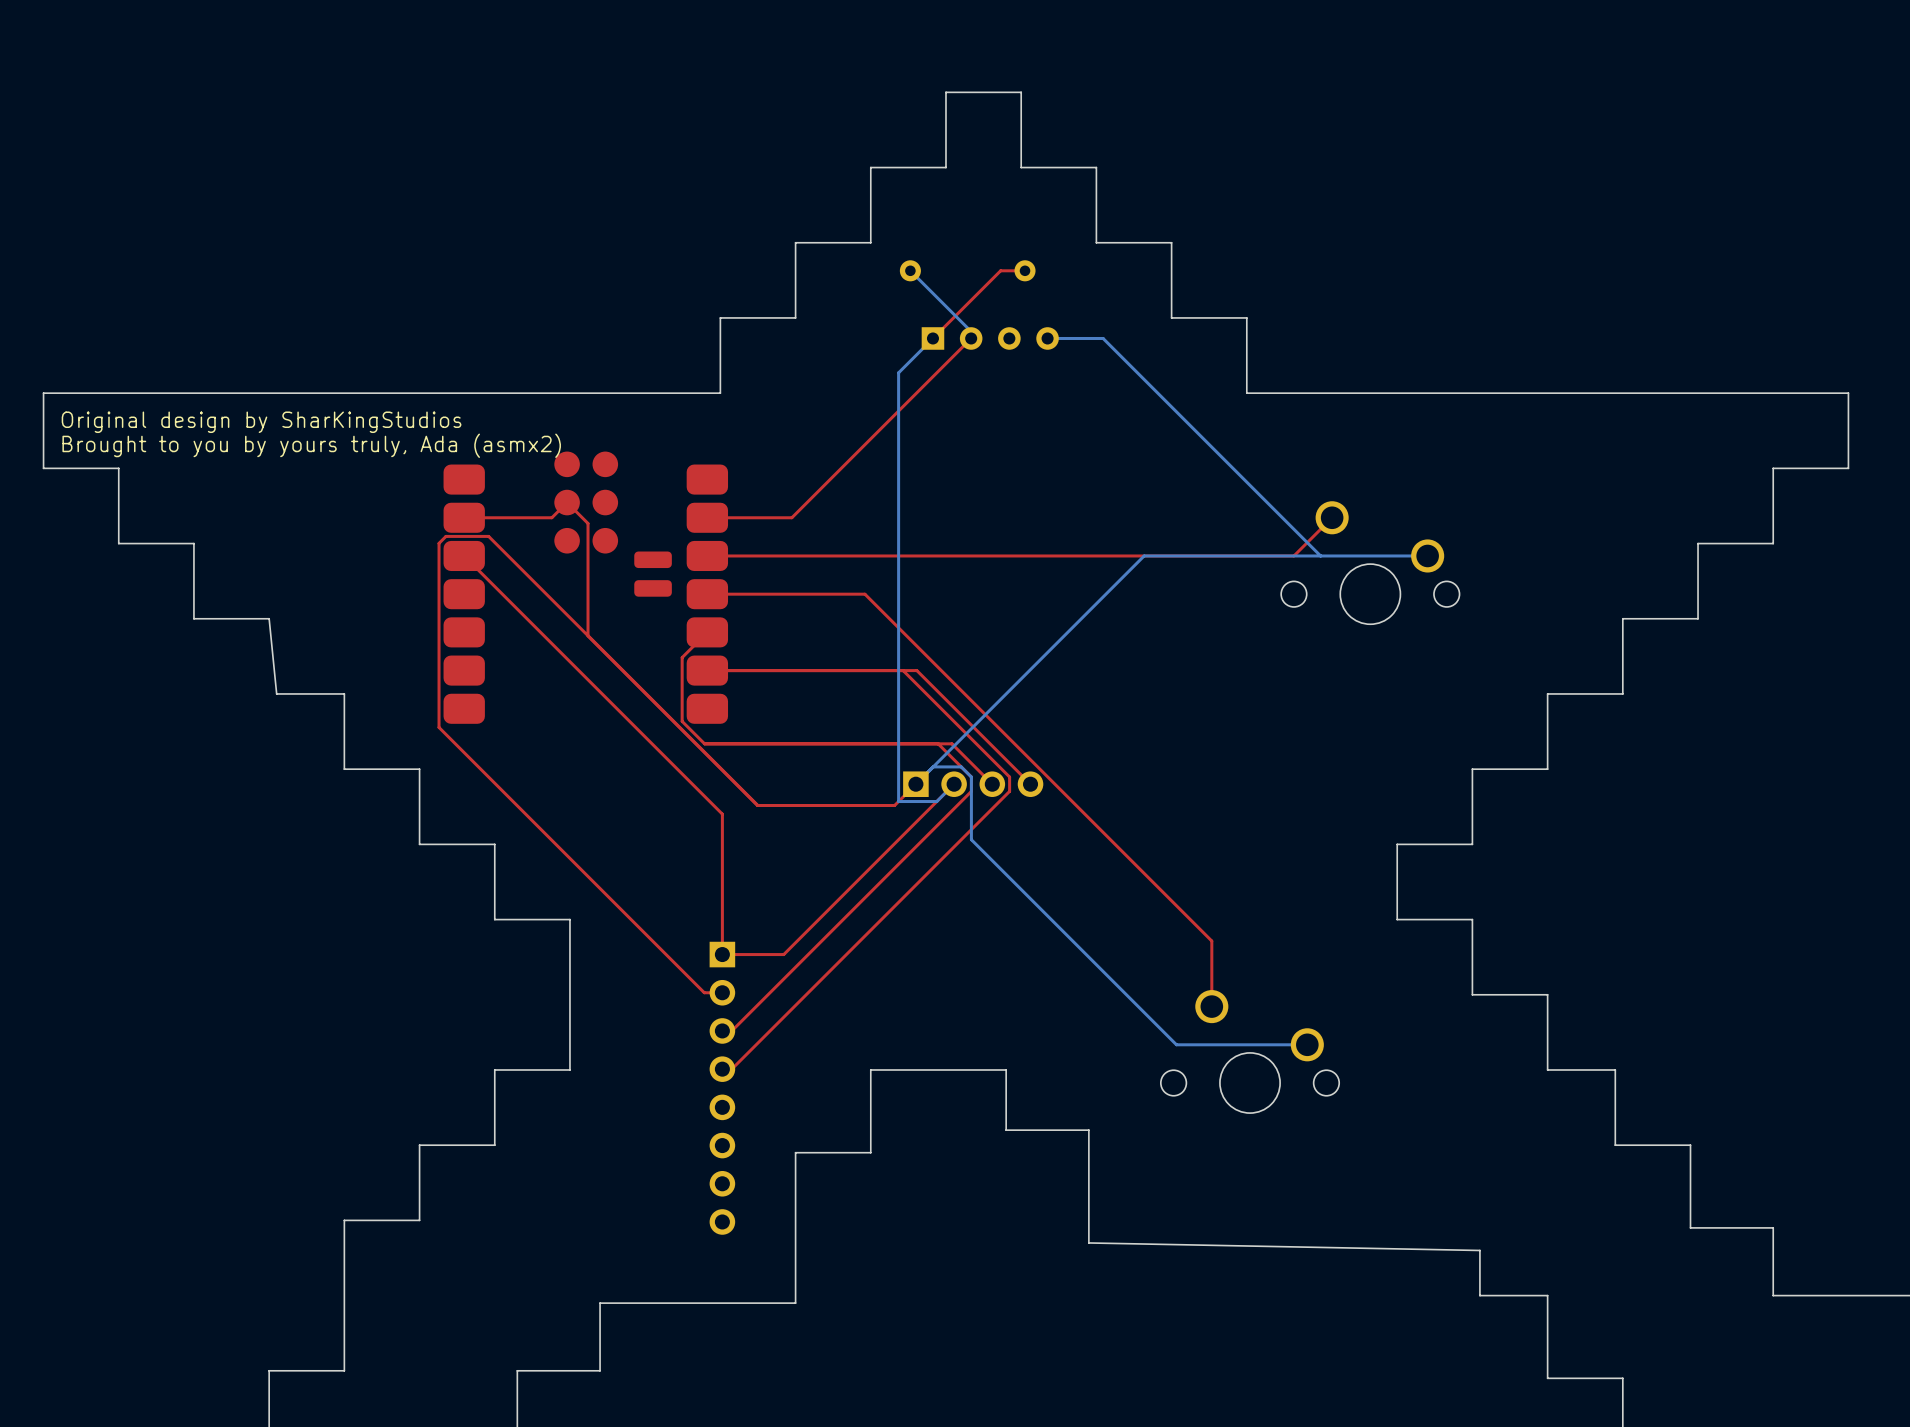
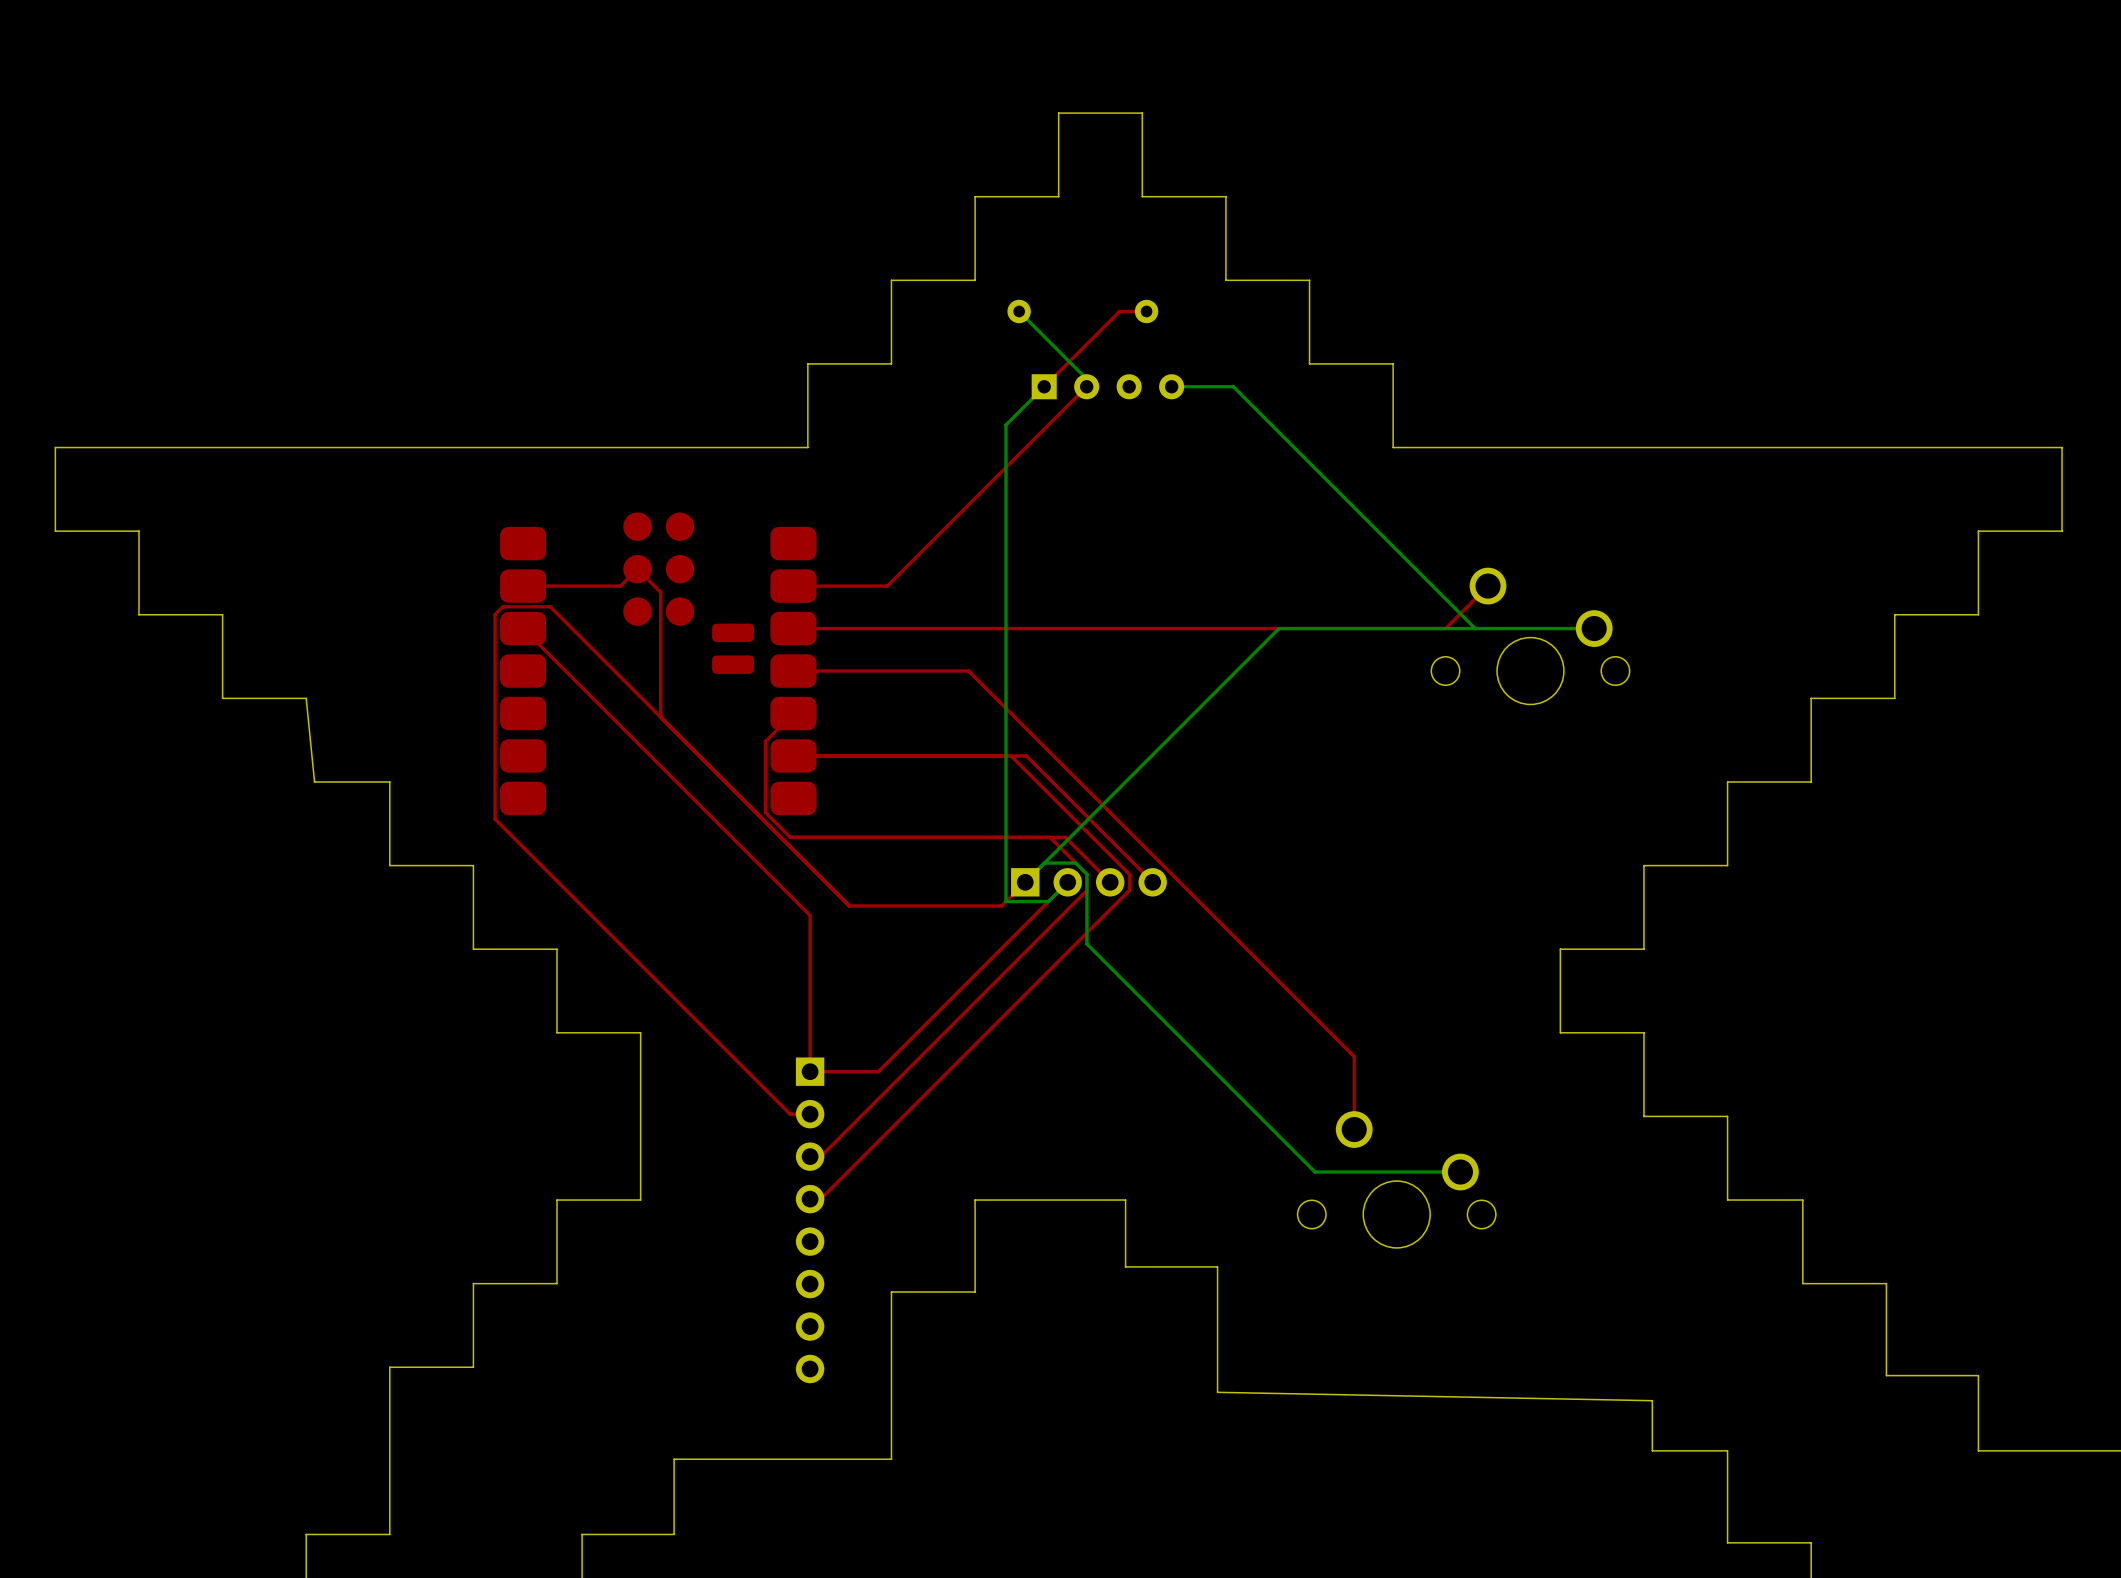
text: Original design by SharKingStudios (261, 422) -> none
text: Brought to you by yours truly, Ada (asmx2) (311, 445) -> none

